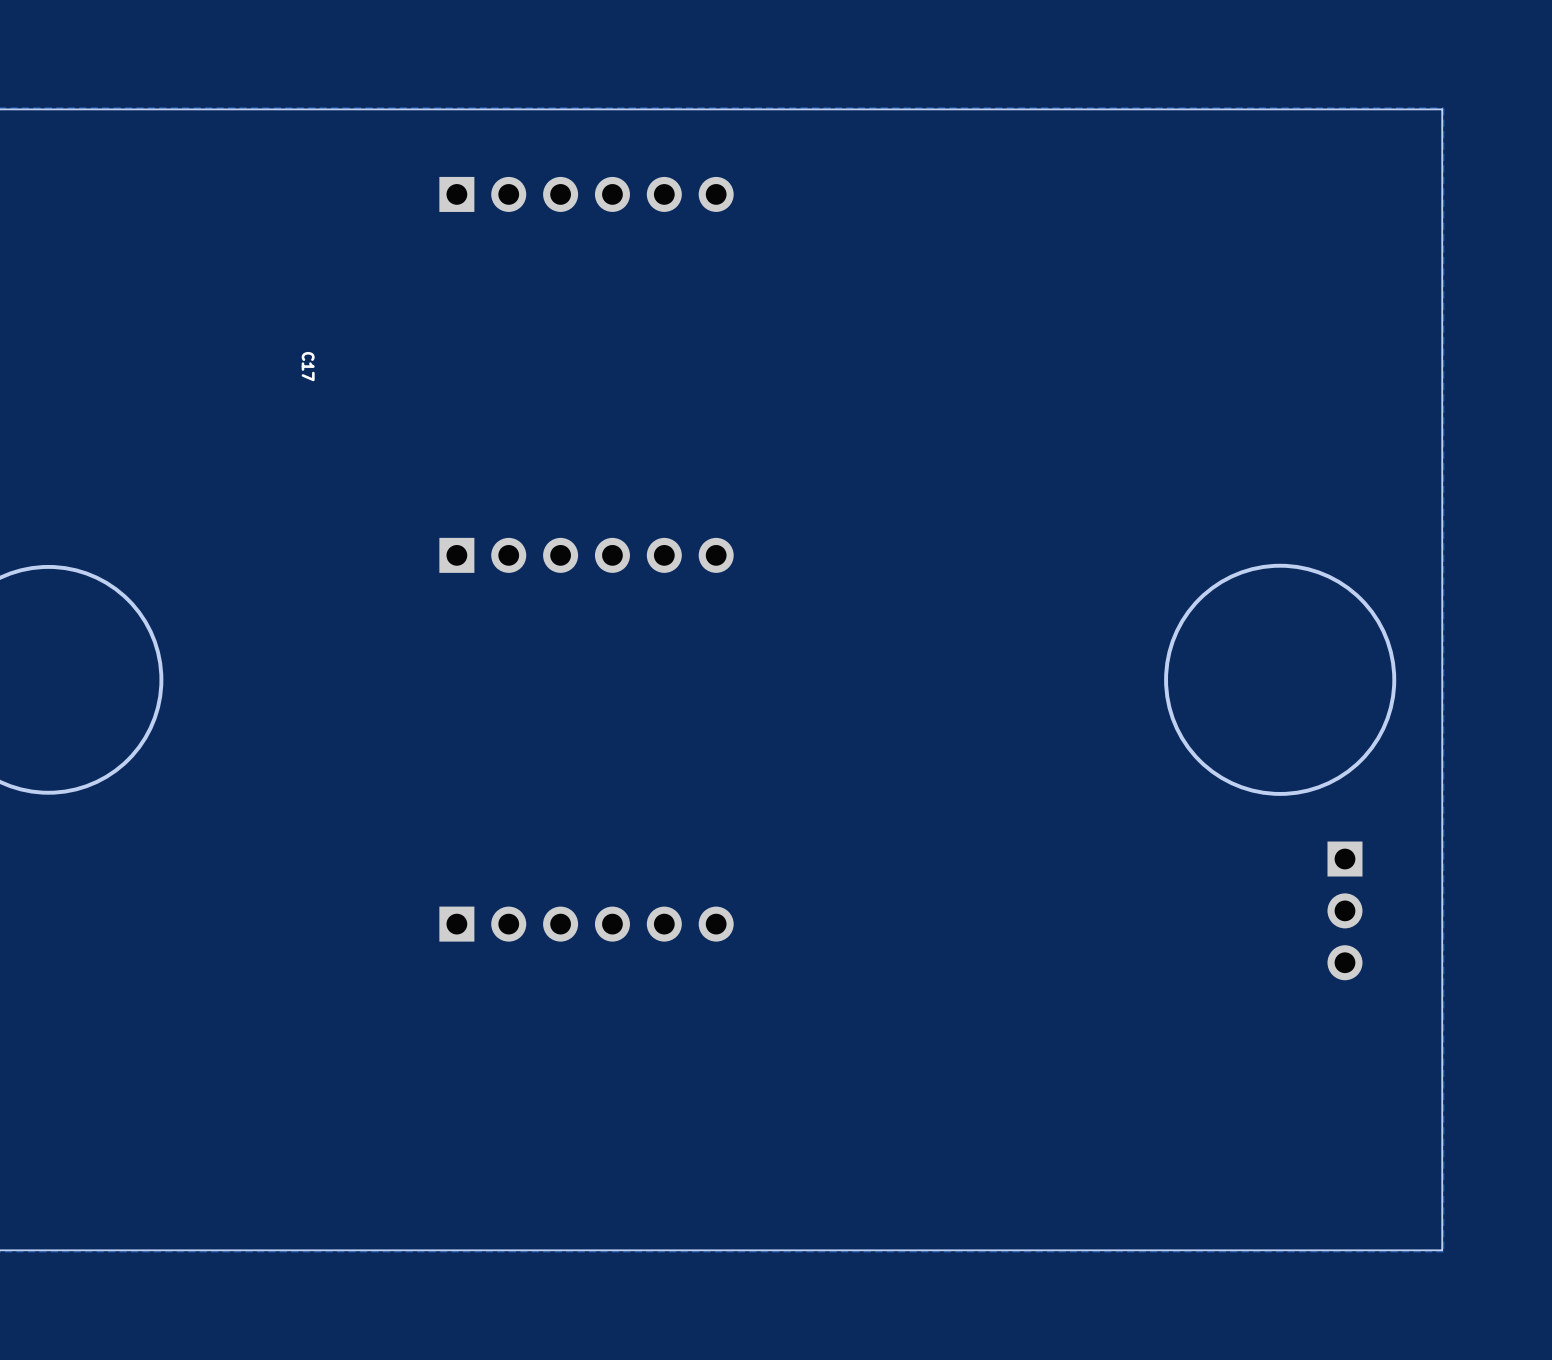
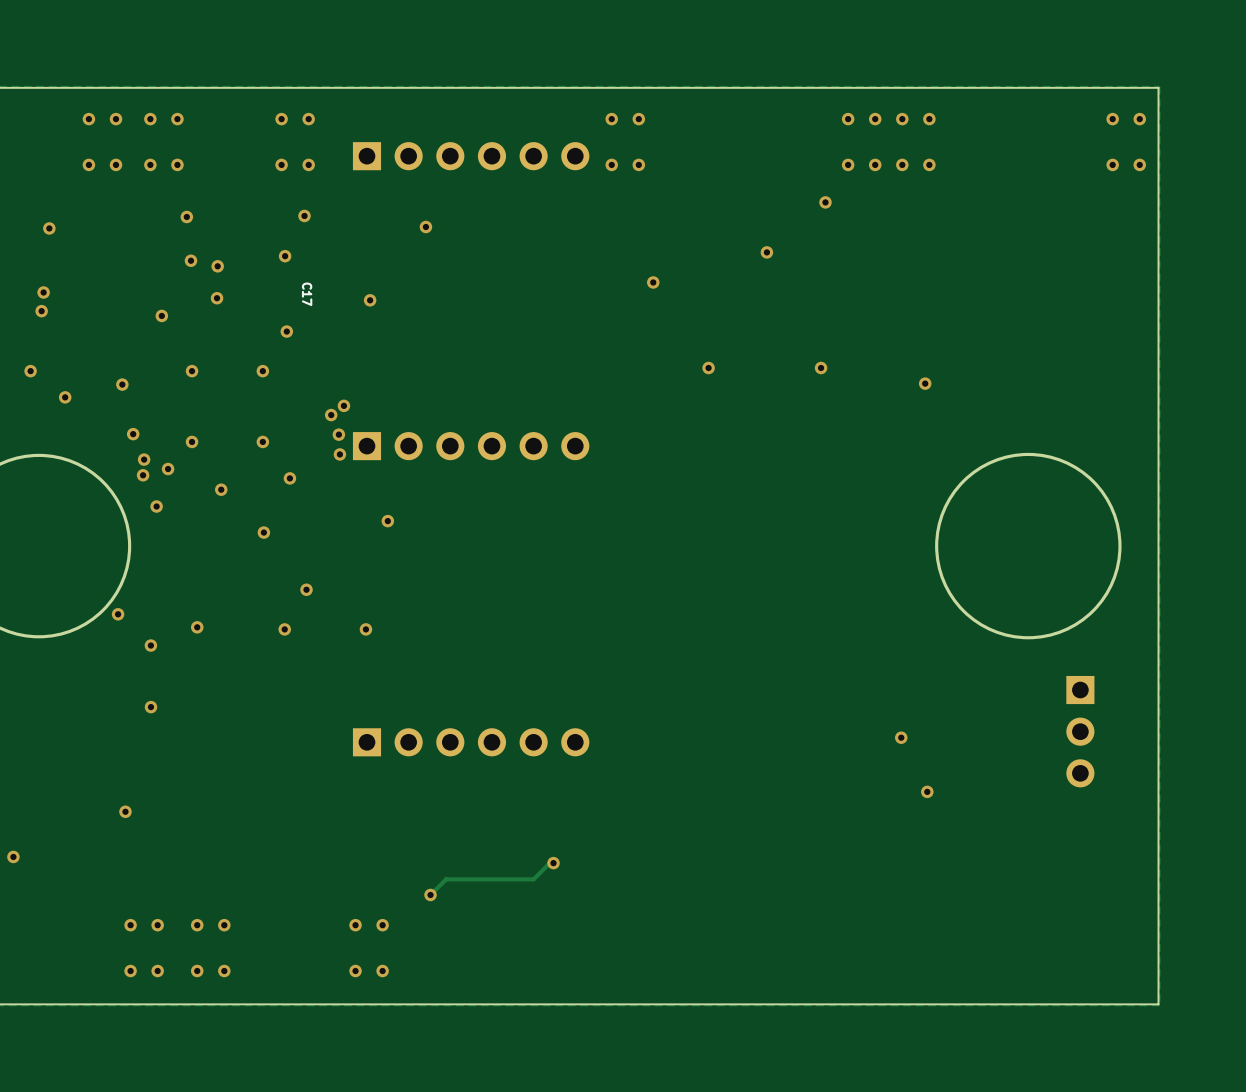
via: none -> (88, 119)
via: none -> (116, 119)
via: none -> (150, 119)
via: none -> (177, 119)
via: none -> (281, 119)
via: none -> (308, 119)
via: none -> (611, 119)
via: none -> (638, 119)
via: none -> (848, 119)
via: none -> (875, 119)
via: none -> (902, 119)
via: none -> (929, 119)
via: none -> (1112, 119)
via: none -> (1139, 119)
via: none -> (88, 164)
via: none -> (116, 164)
via: none -> (150, 164)
via: none -> (177, 164)
via: none -> (281, 164)
via: none -> (308, 164)
via: none -> (611, 164)
via: none -> (638, 164)
via: none -> (848, 164)
via: none -> (875, 164)
via: none -> (902, 164)
via: none -> (929, 164)
via: none -> (1112, 164)
via: none -> (1139, 164)
via: none -> (825, 202)
via: none -> (304, 215)
via: none -> (186, 216)
via: none -> (425, 226)
via: none -> (49, 228)
via: none -> (766, 252)
via: none -> (285, 256)
via: none -> (190, 260)
via: none -> (217, 266)
via: none -> (653, 282)
via: none -> (43, 292)
C17 position: (308, 366) -> (307, 294)
via: none -> (217, 298)
via: none -> (370, 300)
via: none -> (41, 311)
via: none -> (161, 315)
via: none -> (286, 331)
via: none -> (708, 368)
via: none -> (821, 368)
via: none -> (30, 371)
via: none -> (192, 371)
via: none -> (262, 371)
via: none -> (925, 383)
via: none -> (122, 384)
via: none -> (65, 397)
via: none -> (343, 405)
via: none -> (331, 415)
via: none -> (133, 434)
via: none -> (338, 434)
via: none -> (192, 441)
via: none -> (262, 441)
via: none -> (339, 454)
via: none -> (144, 459)
via: none -> (168, 469)
via: none -> (143, 475)
via: none -> (289, 478)
via: none -> (221, 489)
via: none -> (156, 506)
via: none -> (387, 521)
via: none -> (263, 532)
via: none -> (306, 589)
via: none -> (118, 614)
via: none -> (197, 627)
via: none -> (284, 629)
via: none -> (365, 629)
via: none -> (150, 645)
via: none -> (151, 707)
via: none -> (901, 737)
via: none -> (927, 791)
via: none -> (125, 811)
via: none -> (13, 856)
track: none -> (553, 863) (549, 863) (533, 879) (446, 879) (430, 894)
via: none -> (553, 863)
via: none -> (430, 894)
via: none -> (130, 925)
via: none -> (157, 925)
via: none -> (197, 925)
via: none -> (224, 925)
via: none -> (355, 925)
via: none -> (382, 925)
via: none -> (130, 971)
via: none -> (157, 971)
via: none -> (197, 971)
via: none -> (224, 971)
via: none -> (355, 971)
via: none -> (382, 971)

